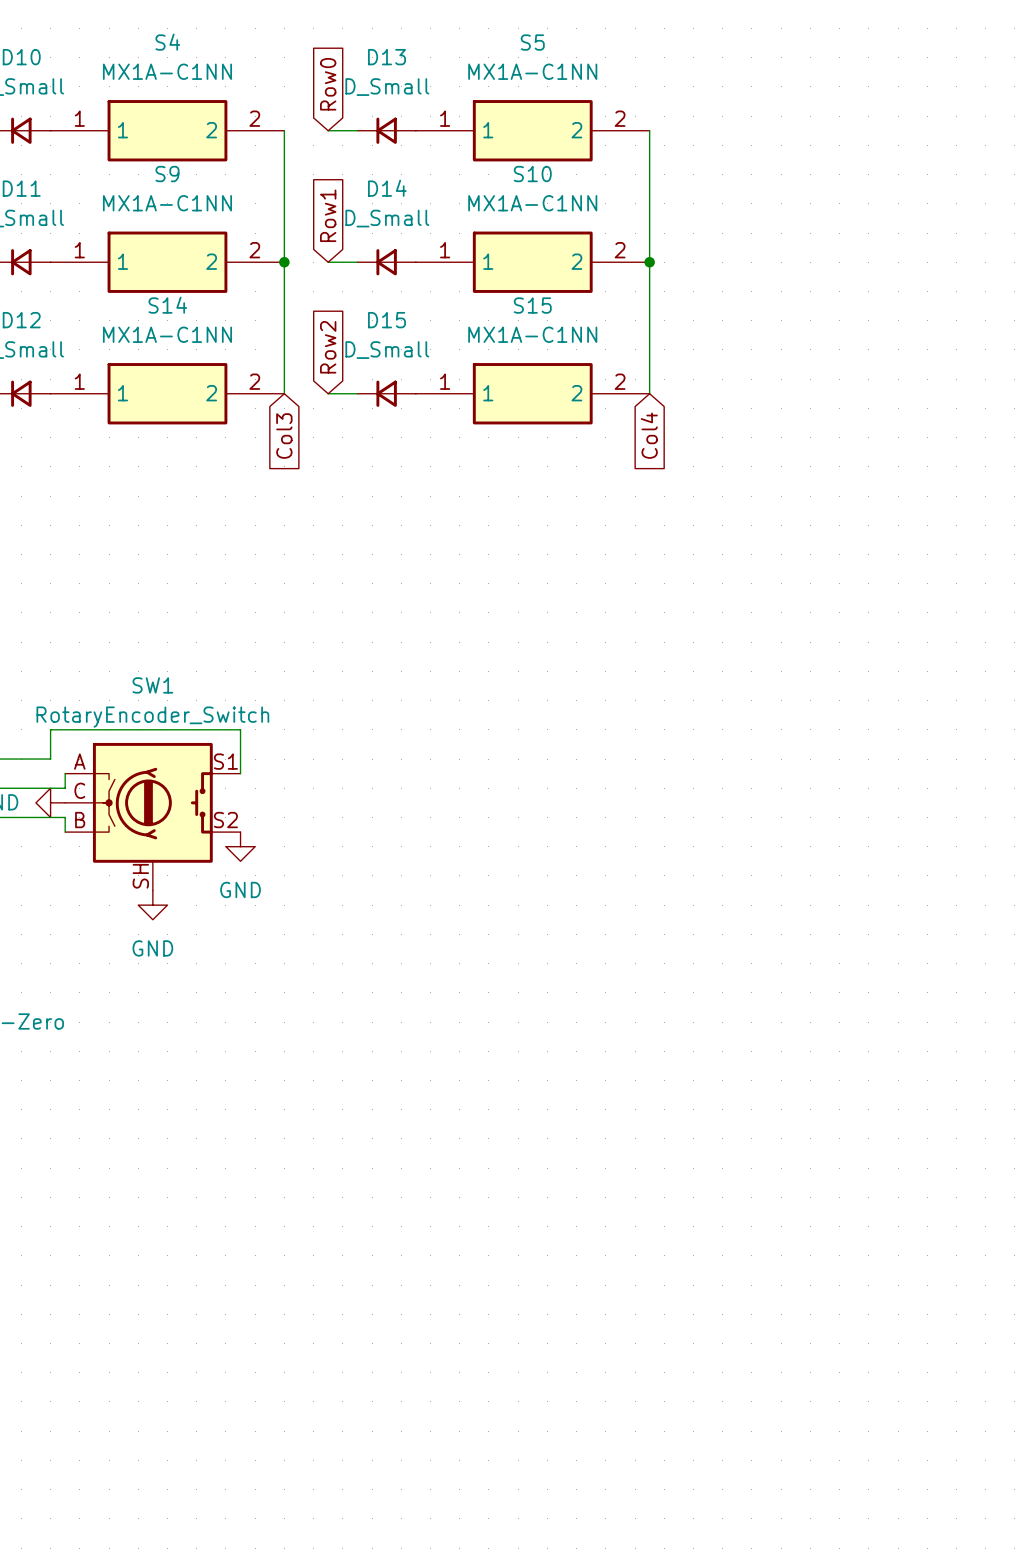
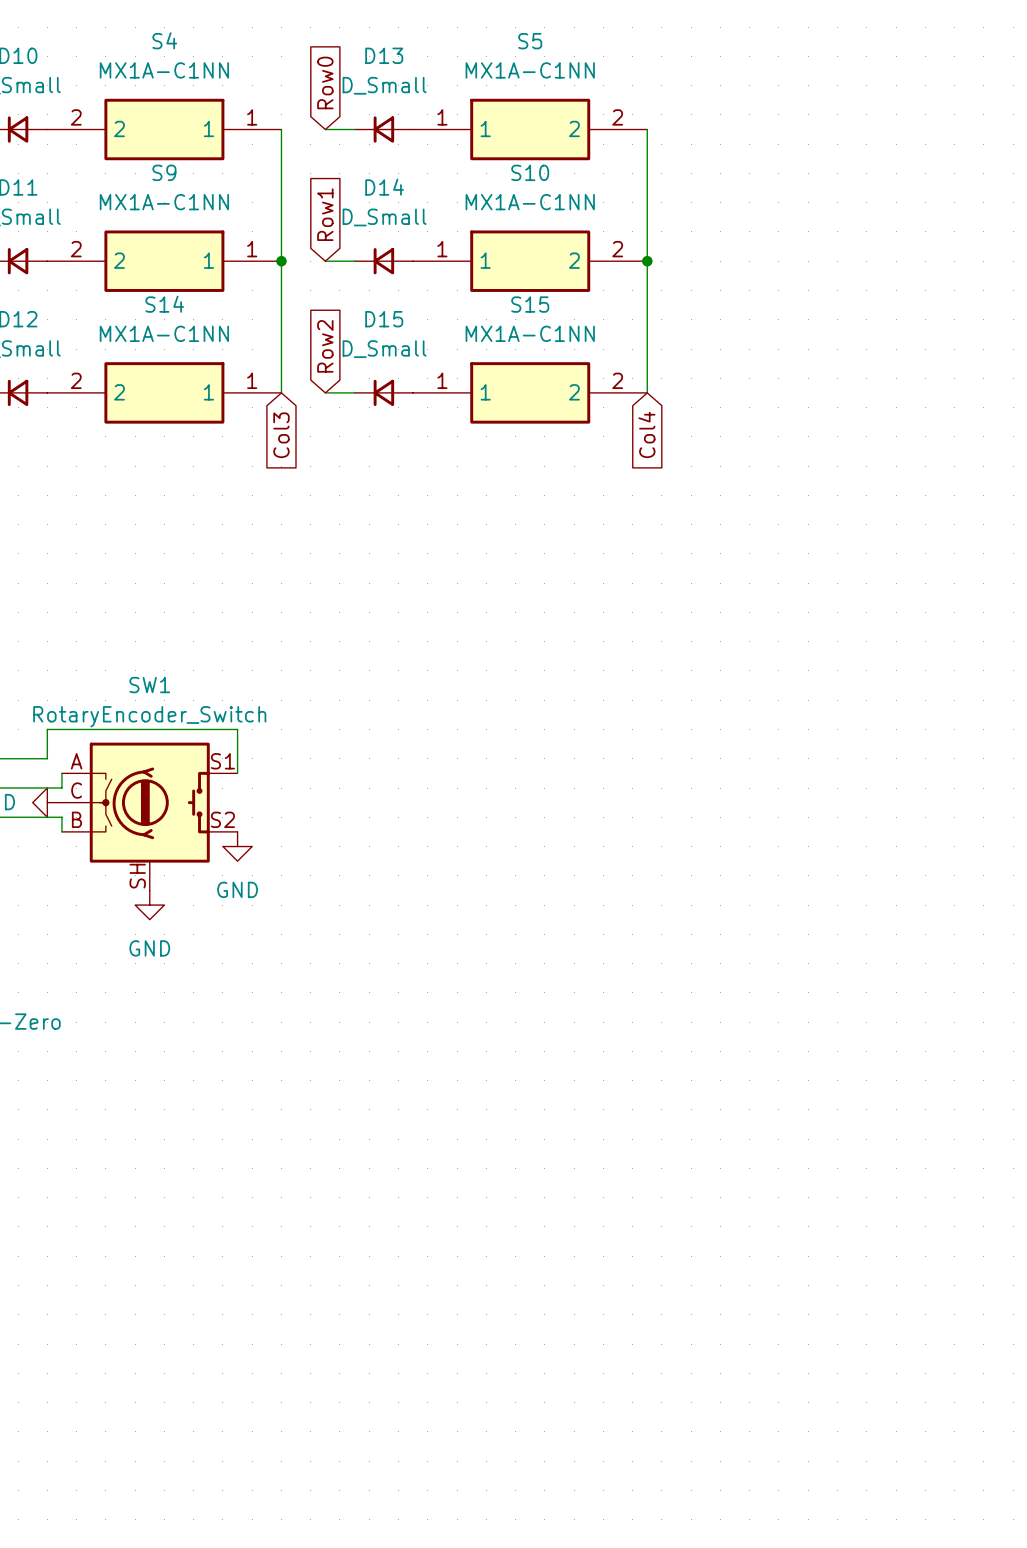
S4 rotation: 0° (167, 130) -> 180° (164, 129)
S9 rotation: 0° (167, 262) -> 180° (164, 261)
S14 rotation: 0° (167, 393) -> 180° (164, 392)

